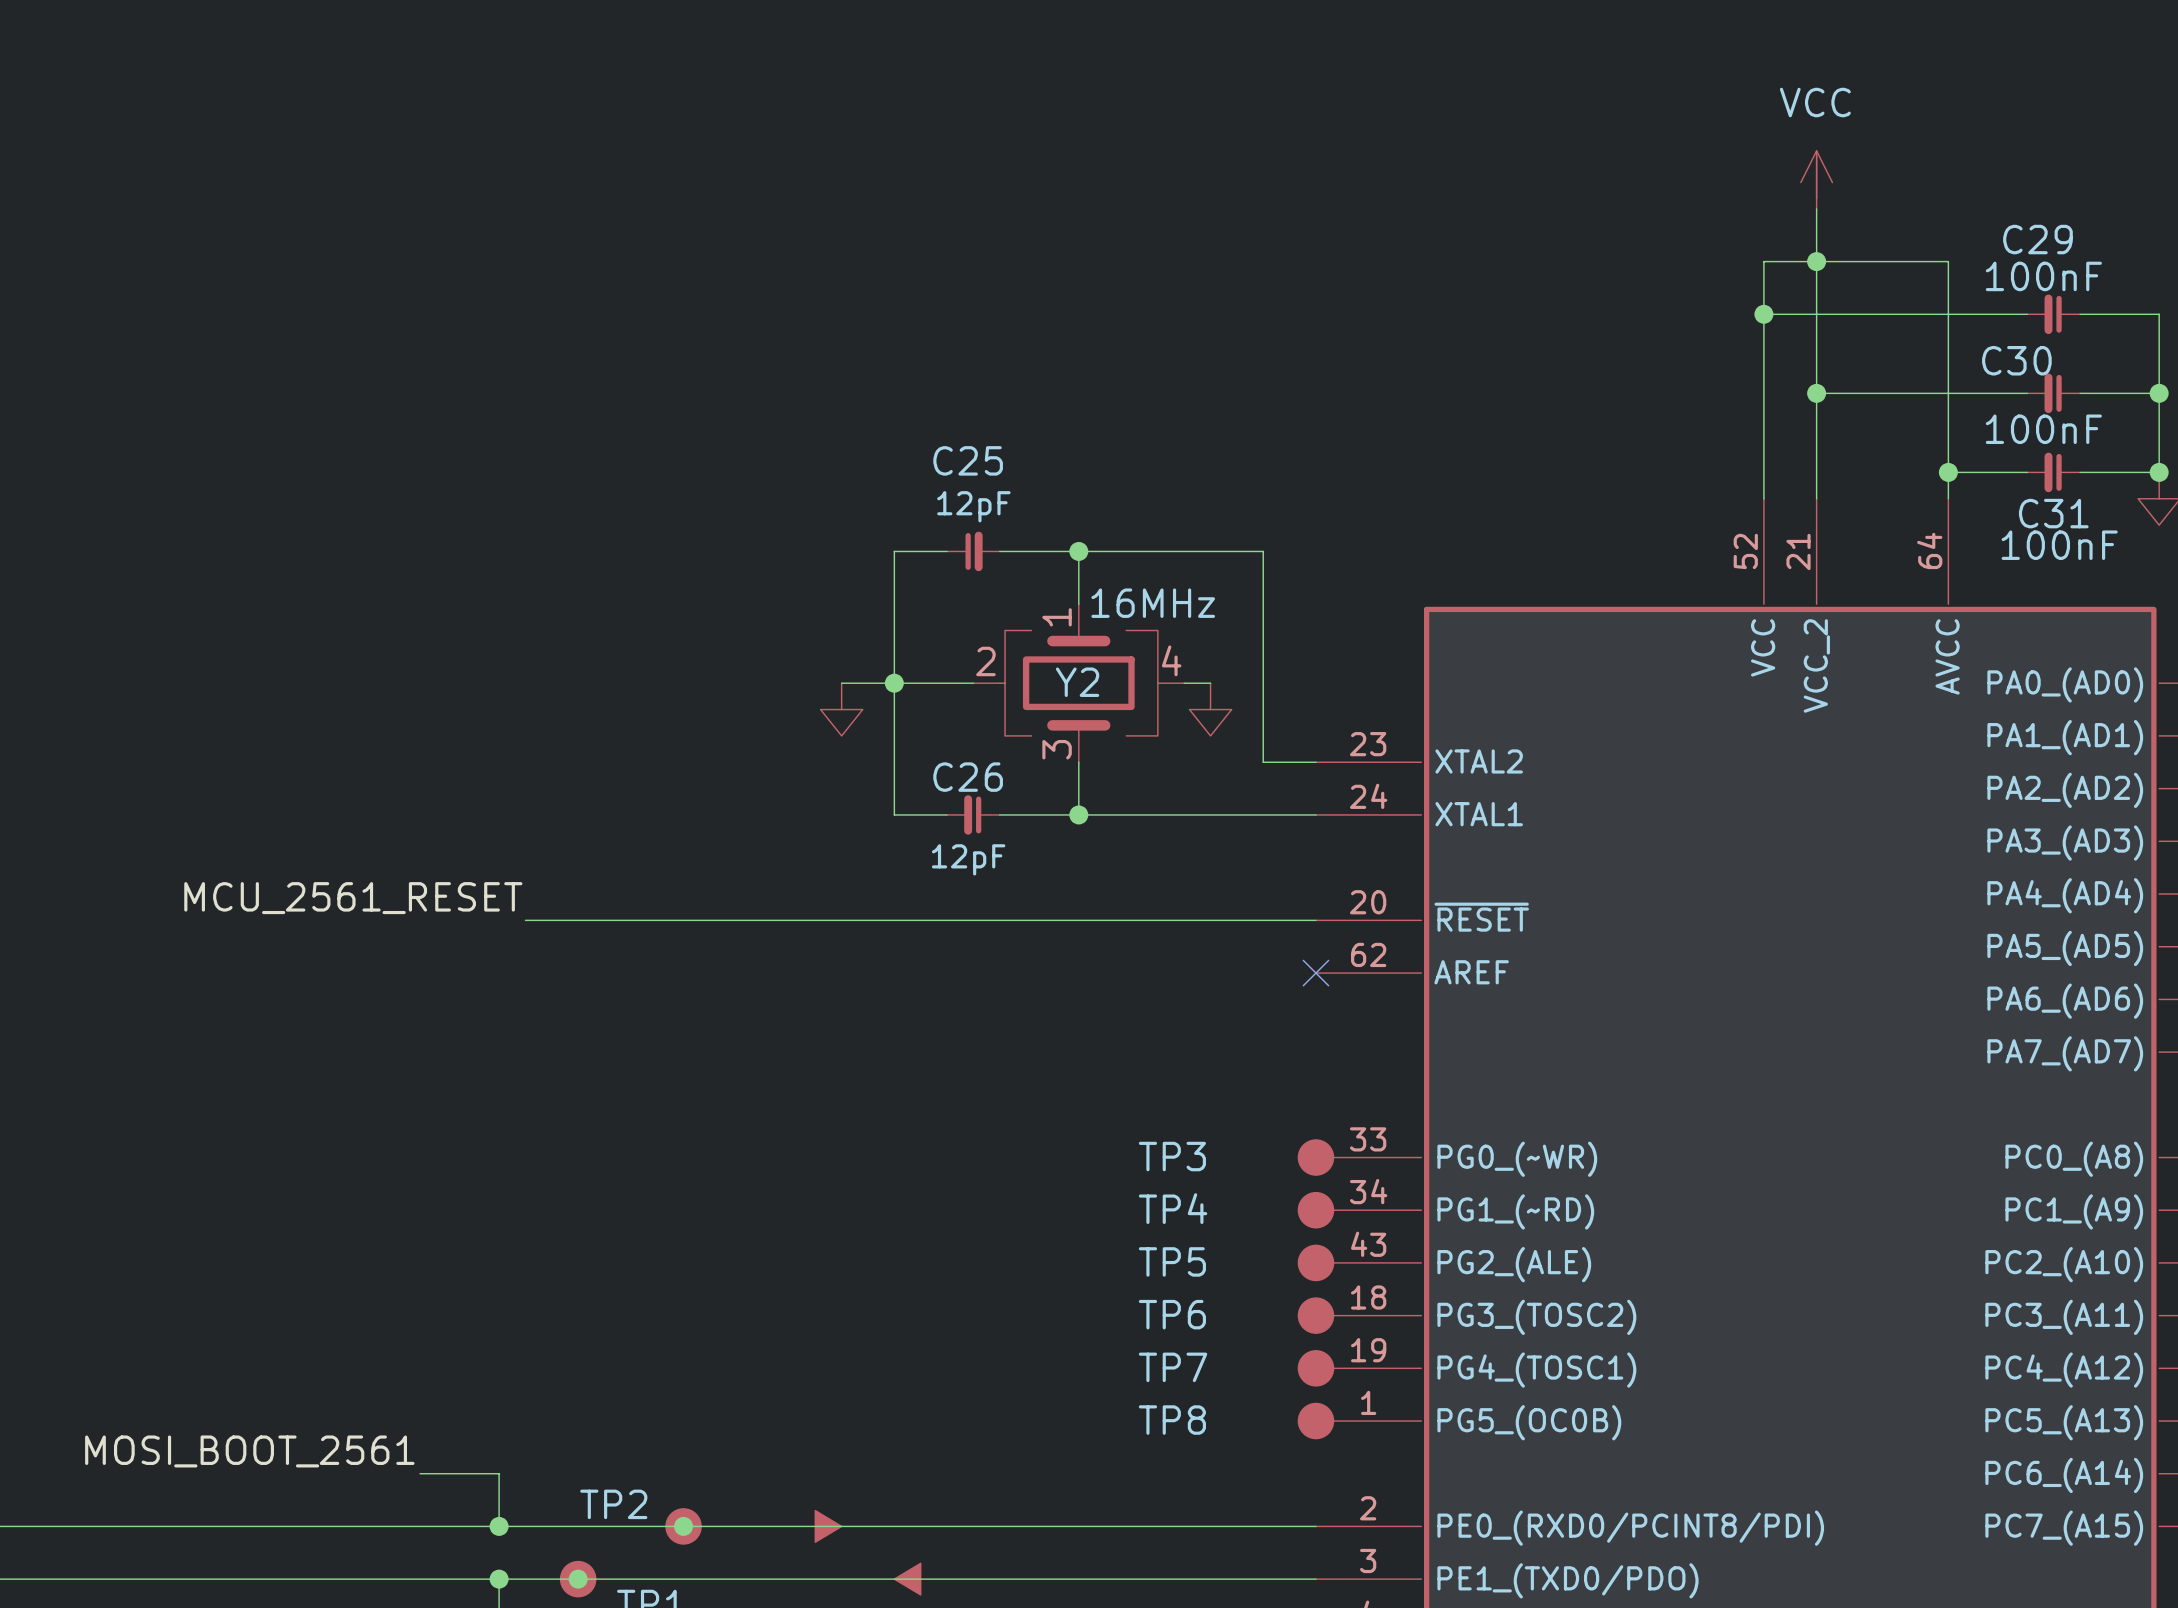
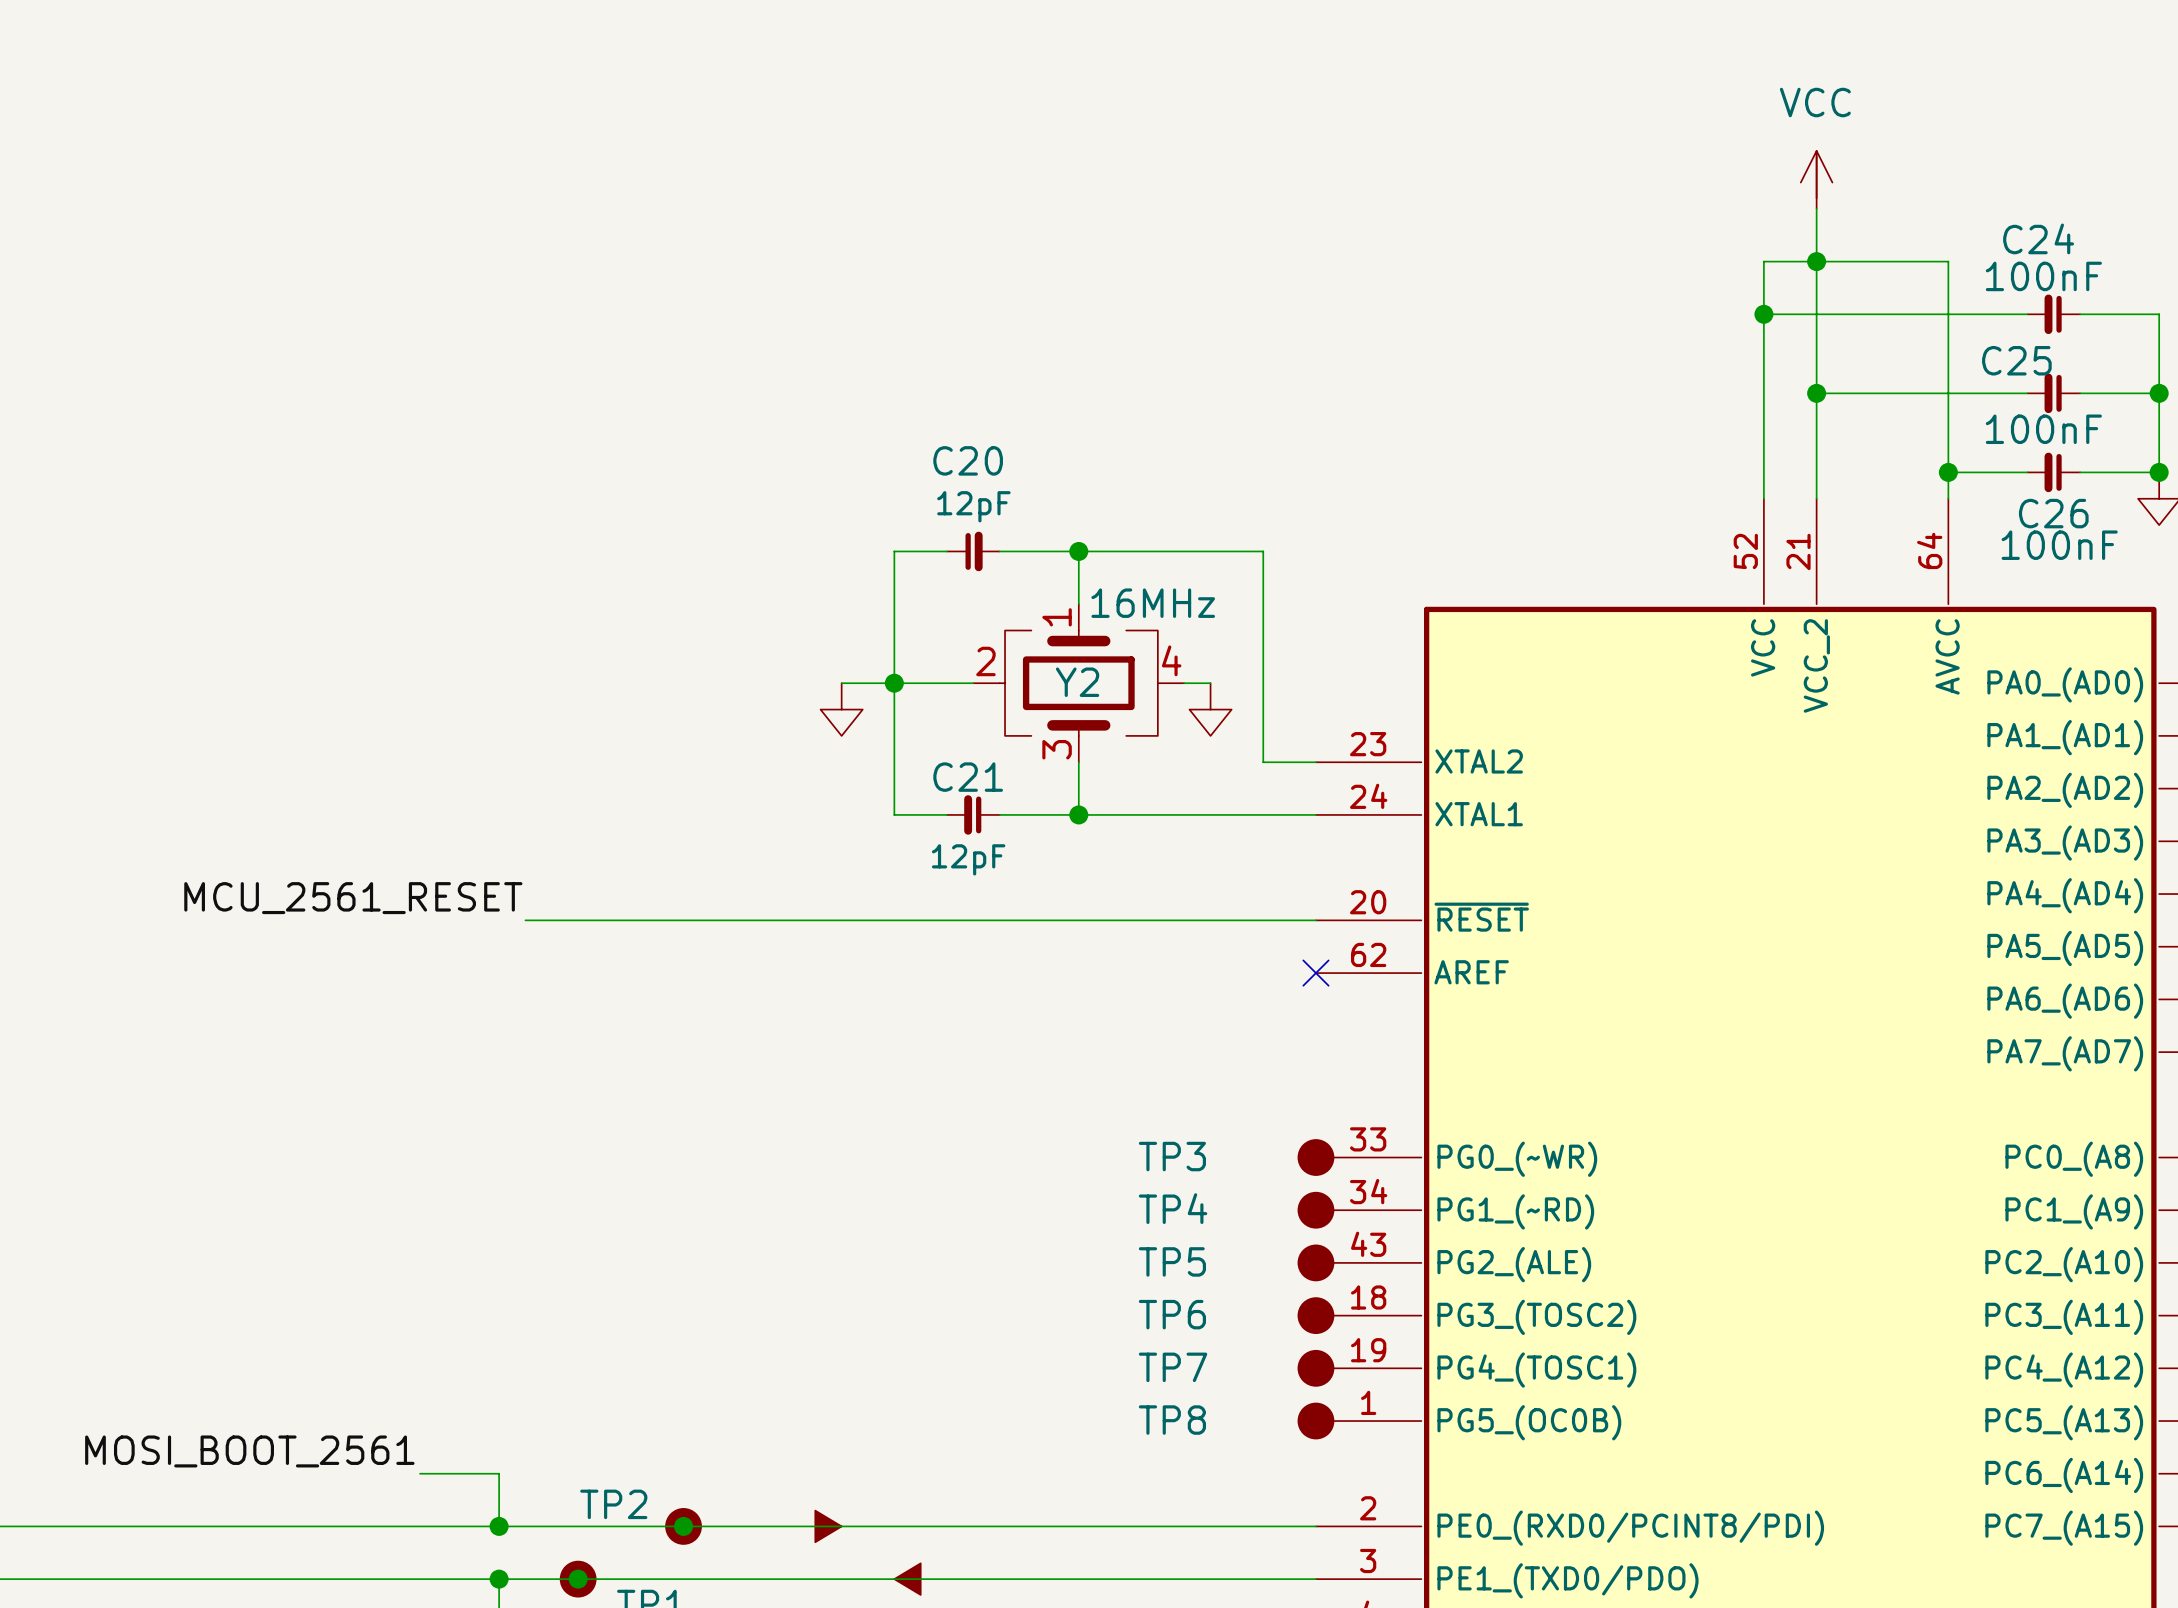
C29 name: C29 (2037, 239) -> C24 (2038, 238)
C30 name: C30 (2016, 360) -> C25 (2016, 360)
C25 name: C25 (968, 460) -> C20 (968, 460)
C31 name: C31 (2053, 513) -> C26 (2053, 513)
C26 name: C26 (968, 777) -> C21 (968, 777)

